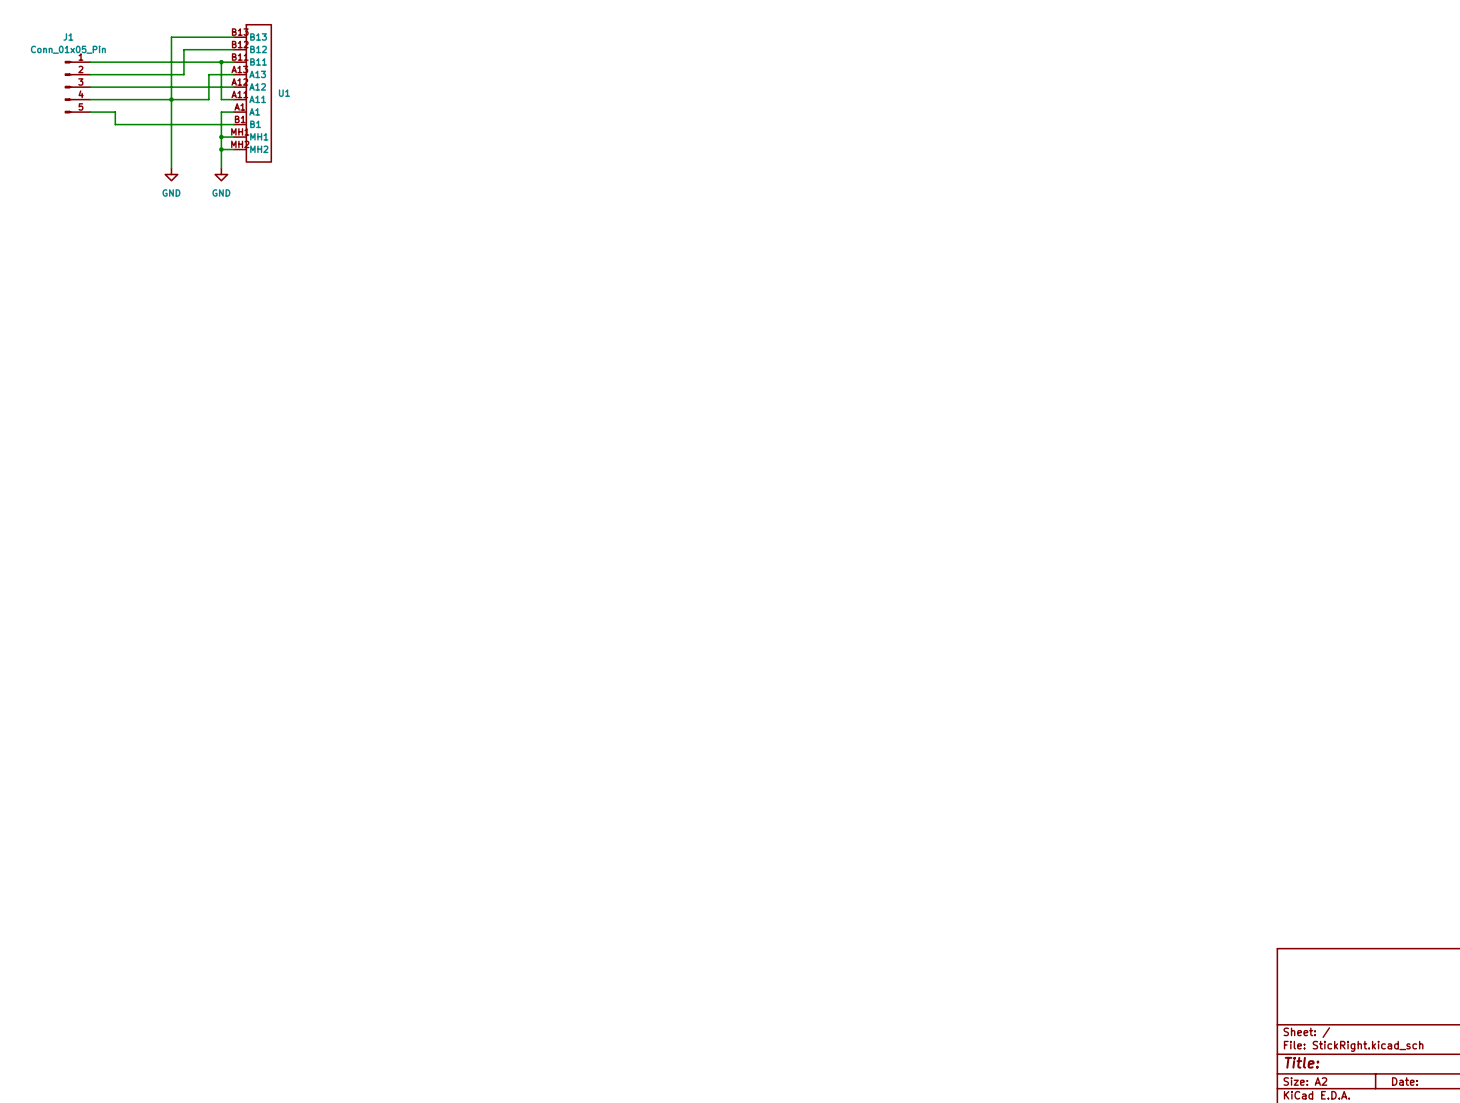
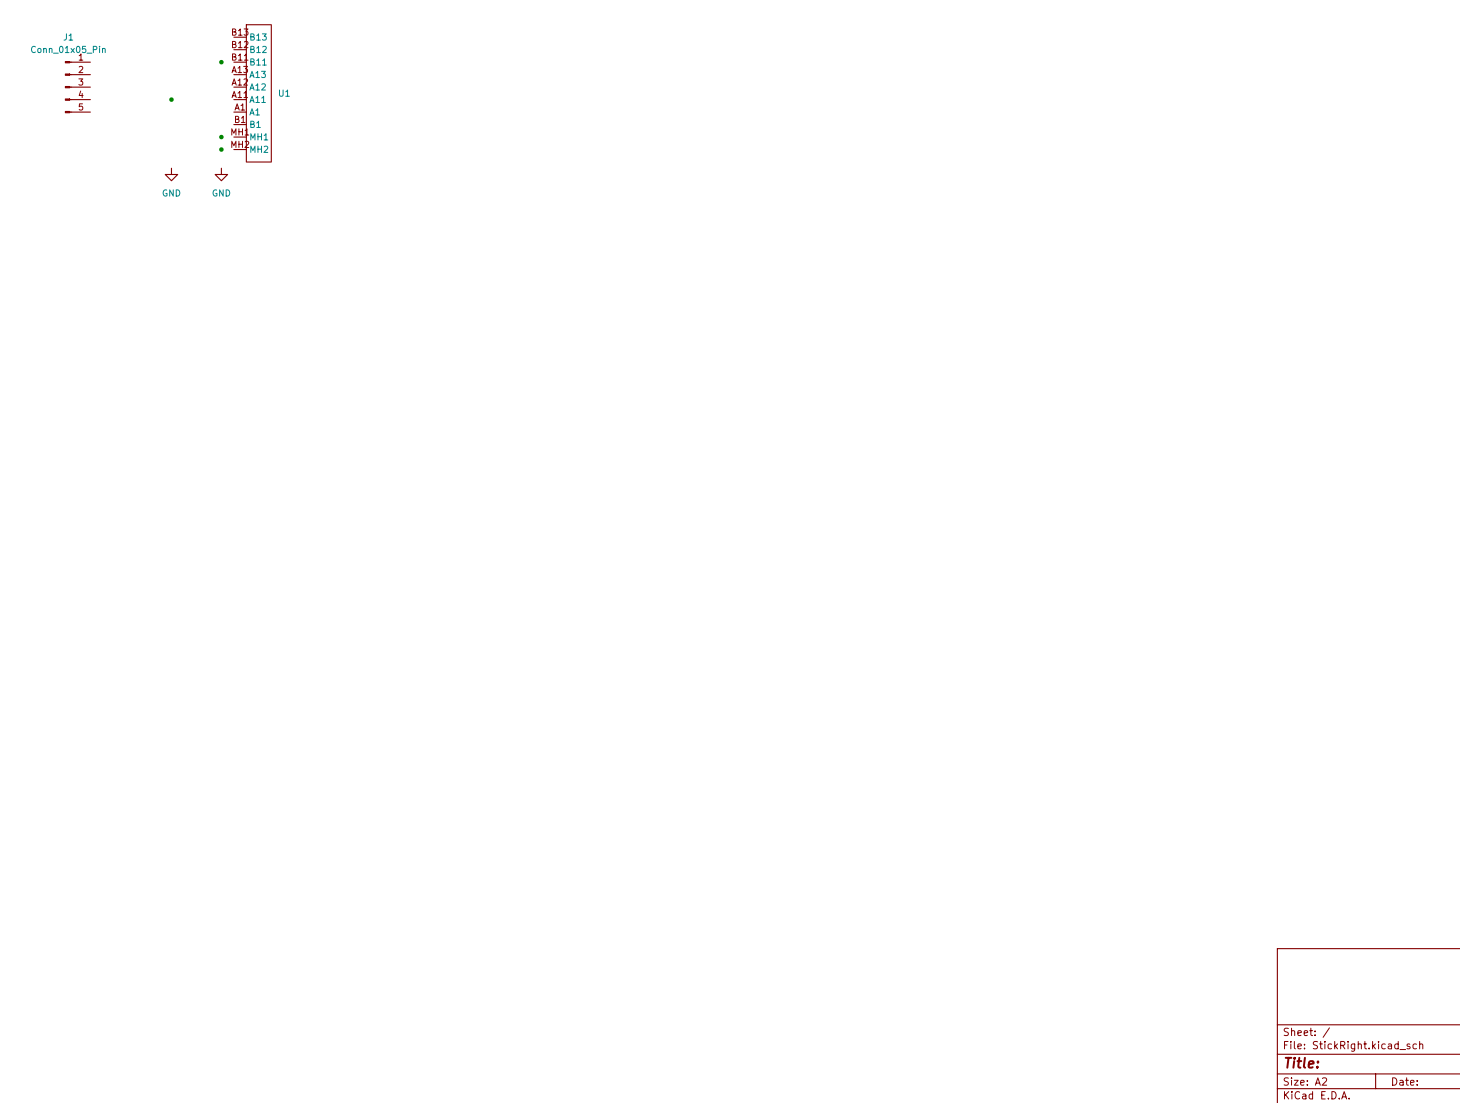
wire: (233, 37) (171, 37) (171, 168) -> none
wire: (233, 49) (183, 49) (183, 74) (90, 74) -> none
wire: (90, 62) (233, 62) -> none
wire: (221, 62) (221, 99) (233, 99) -> none
wire: (233, 74) (208, 74) (208, 99) (90, 99) -> none
wire: (90, 87) (233, 87) -> none
wire: (90, 112) (115, 112) (115, 124) (233, 124) -> none
wire: (233, 112) (221, 112) (221, 168) -> none
wire: (221, 137) (233, 137) -> none
wire: (221, 149) (233, 149) -> none

